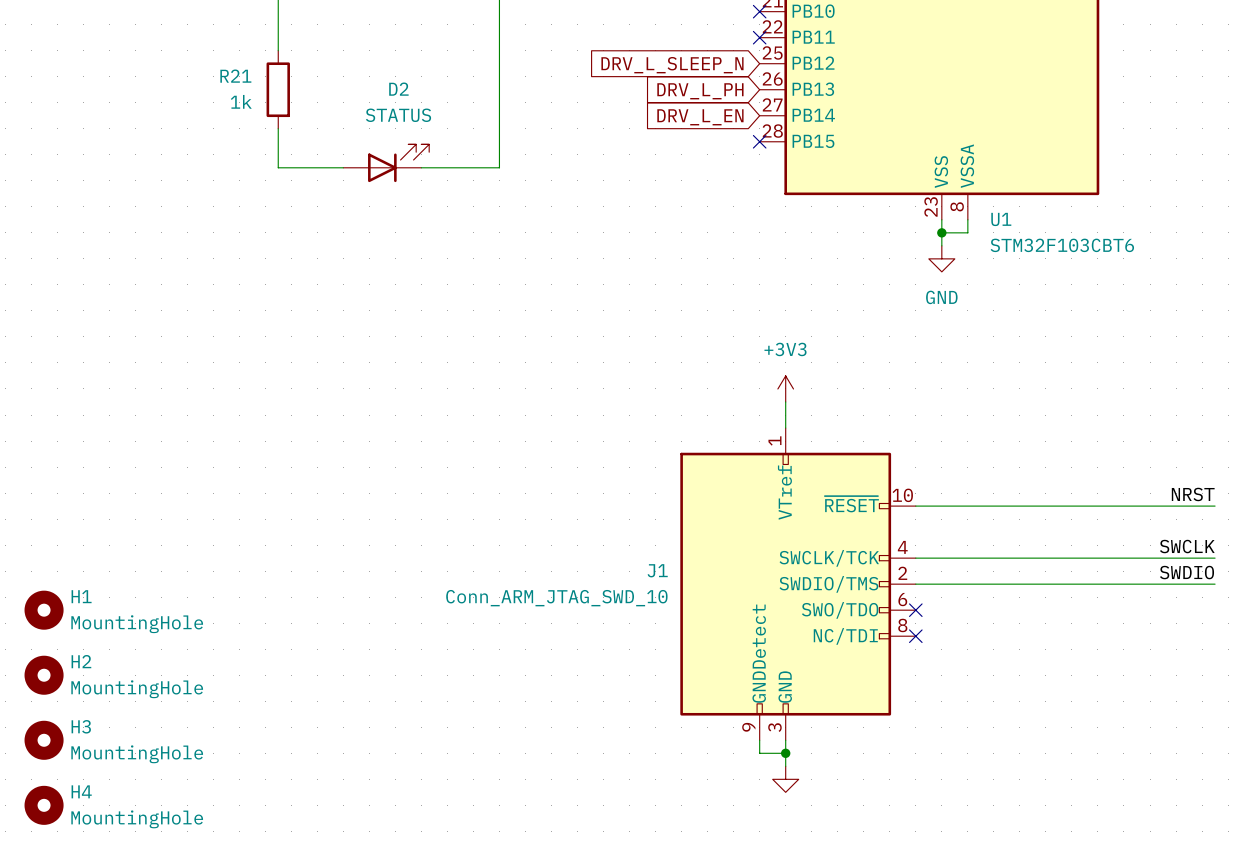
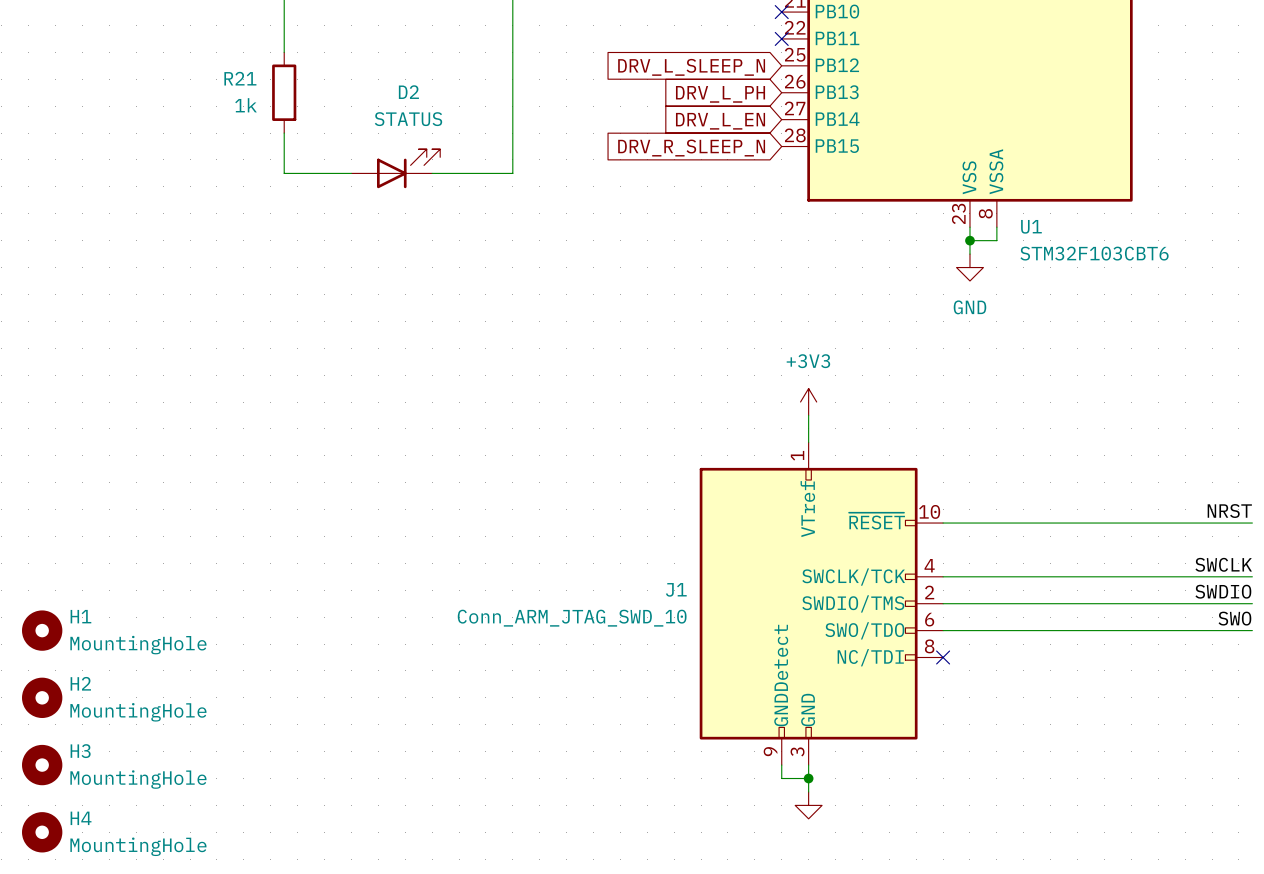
no-connect mark: (759, 141) -> none
global label: none -> DRV_R_SLEEP_N (691, 148)
label: none -> SWO (1234, 618)
wire: none -> (943, 630) (1252, 630)
no-connect mark: (915, 610) -> none

